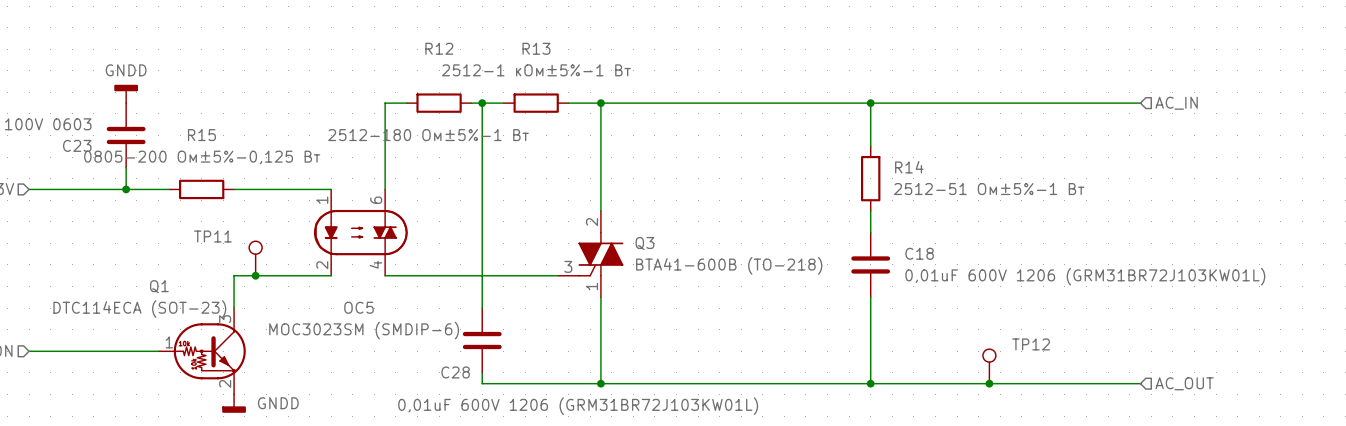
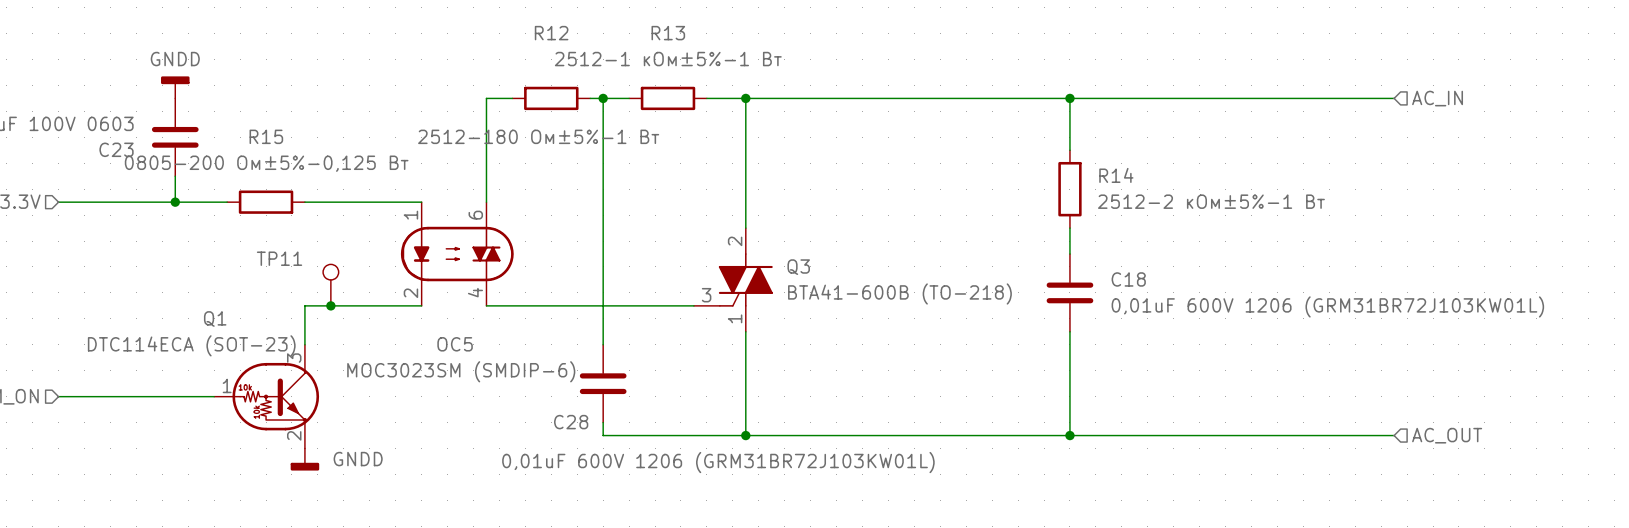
R14 value: 2512-51 Ом±5%-1 Вт (989, 189) -> 2512-2 кОм±5%-1 Вт (1211, 201)
TP12: (989, 366) -> none
junction: (989, 383) -> none

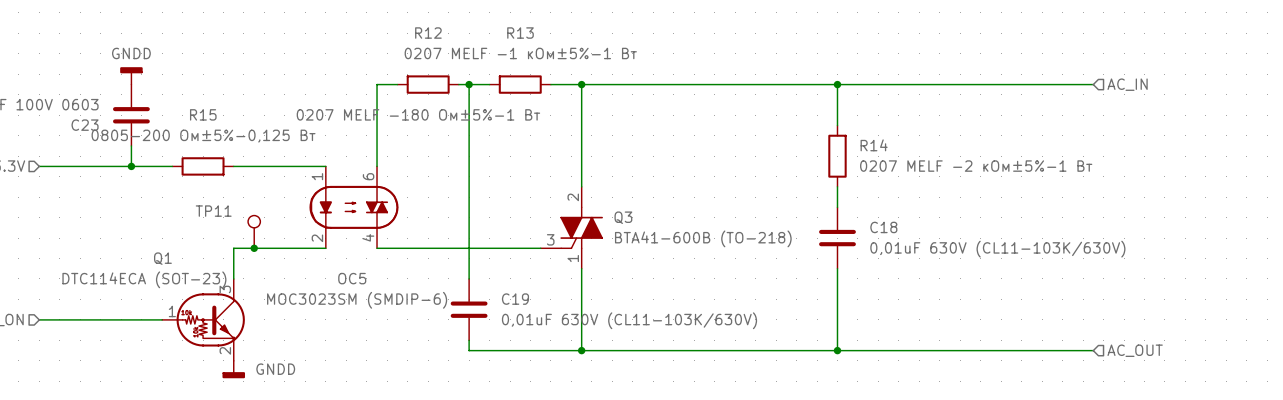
R13 value: 2512-1 кОм±5%-1 Вт (668, 59) -> 0207 MELF -1 кОм±5%-1 Вт (520, 53)
R12 value: 2512-180 Ом±5%-1 Вт (538, 136) -> 0207 MELF -180 Ом±5%-1 Вт (418, 114)
R14 value: 2512-2 кОм±5%-1 Вт (1211, 201) -> 0207 MELF -2 кОм±5%-1 Вт (976, 166)
C18 value: 0,01uF 600V 1206 (GRM31BR72J103KW01L) (1327, 306) -> 0,01uF 630V (CL11-103K/630V) (997, 249)
C28 name: C28 (571, 422) -> C19 (515, 299)
C28 value: 0,01uF 600V 1206 (GRM31BR72J103KW01L) (718, 462) -> 0,01uF 630V (CL11-103K/630V) (629, 320)

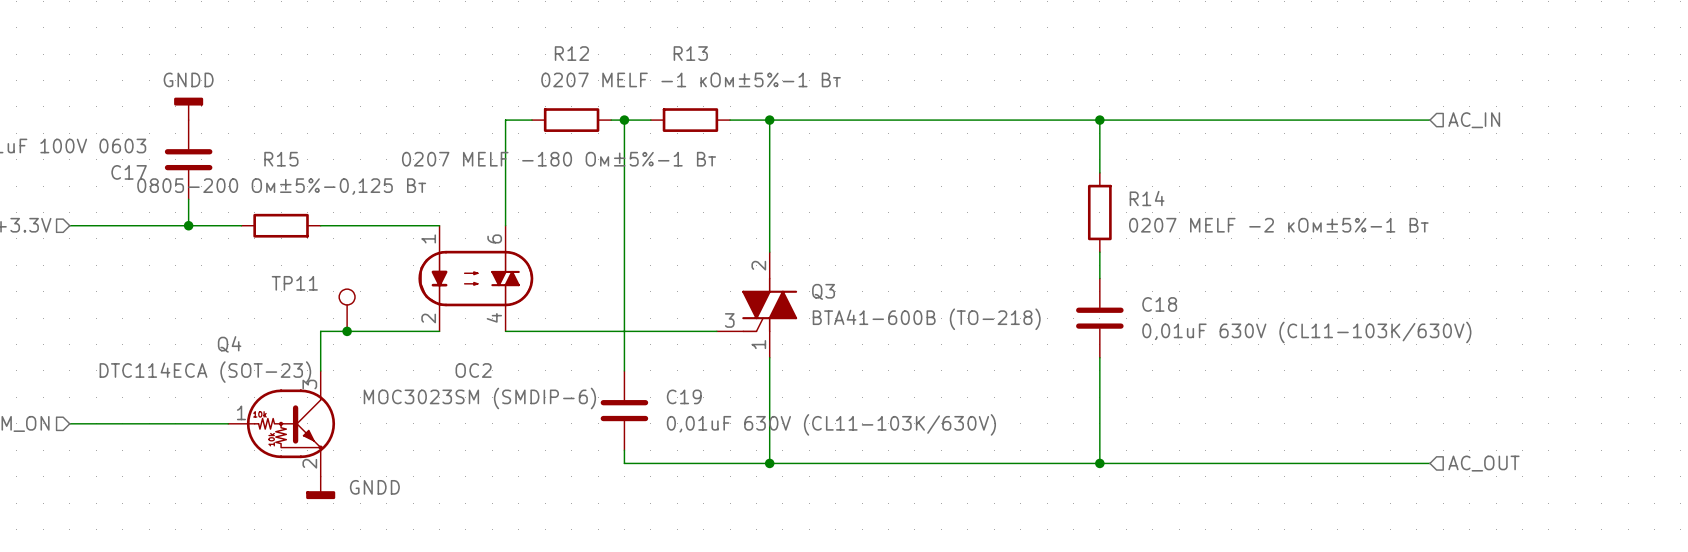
C23 name: C23 (85, 125) -> C17 (129, 172)
Q1 name: Q1 (162, 258) -> Q4 (229, 344)
OC5 name: OC5 (352, 278) -> OC2 (473, 370)

